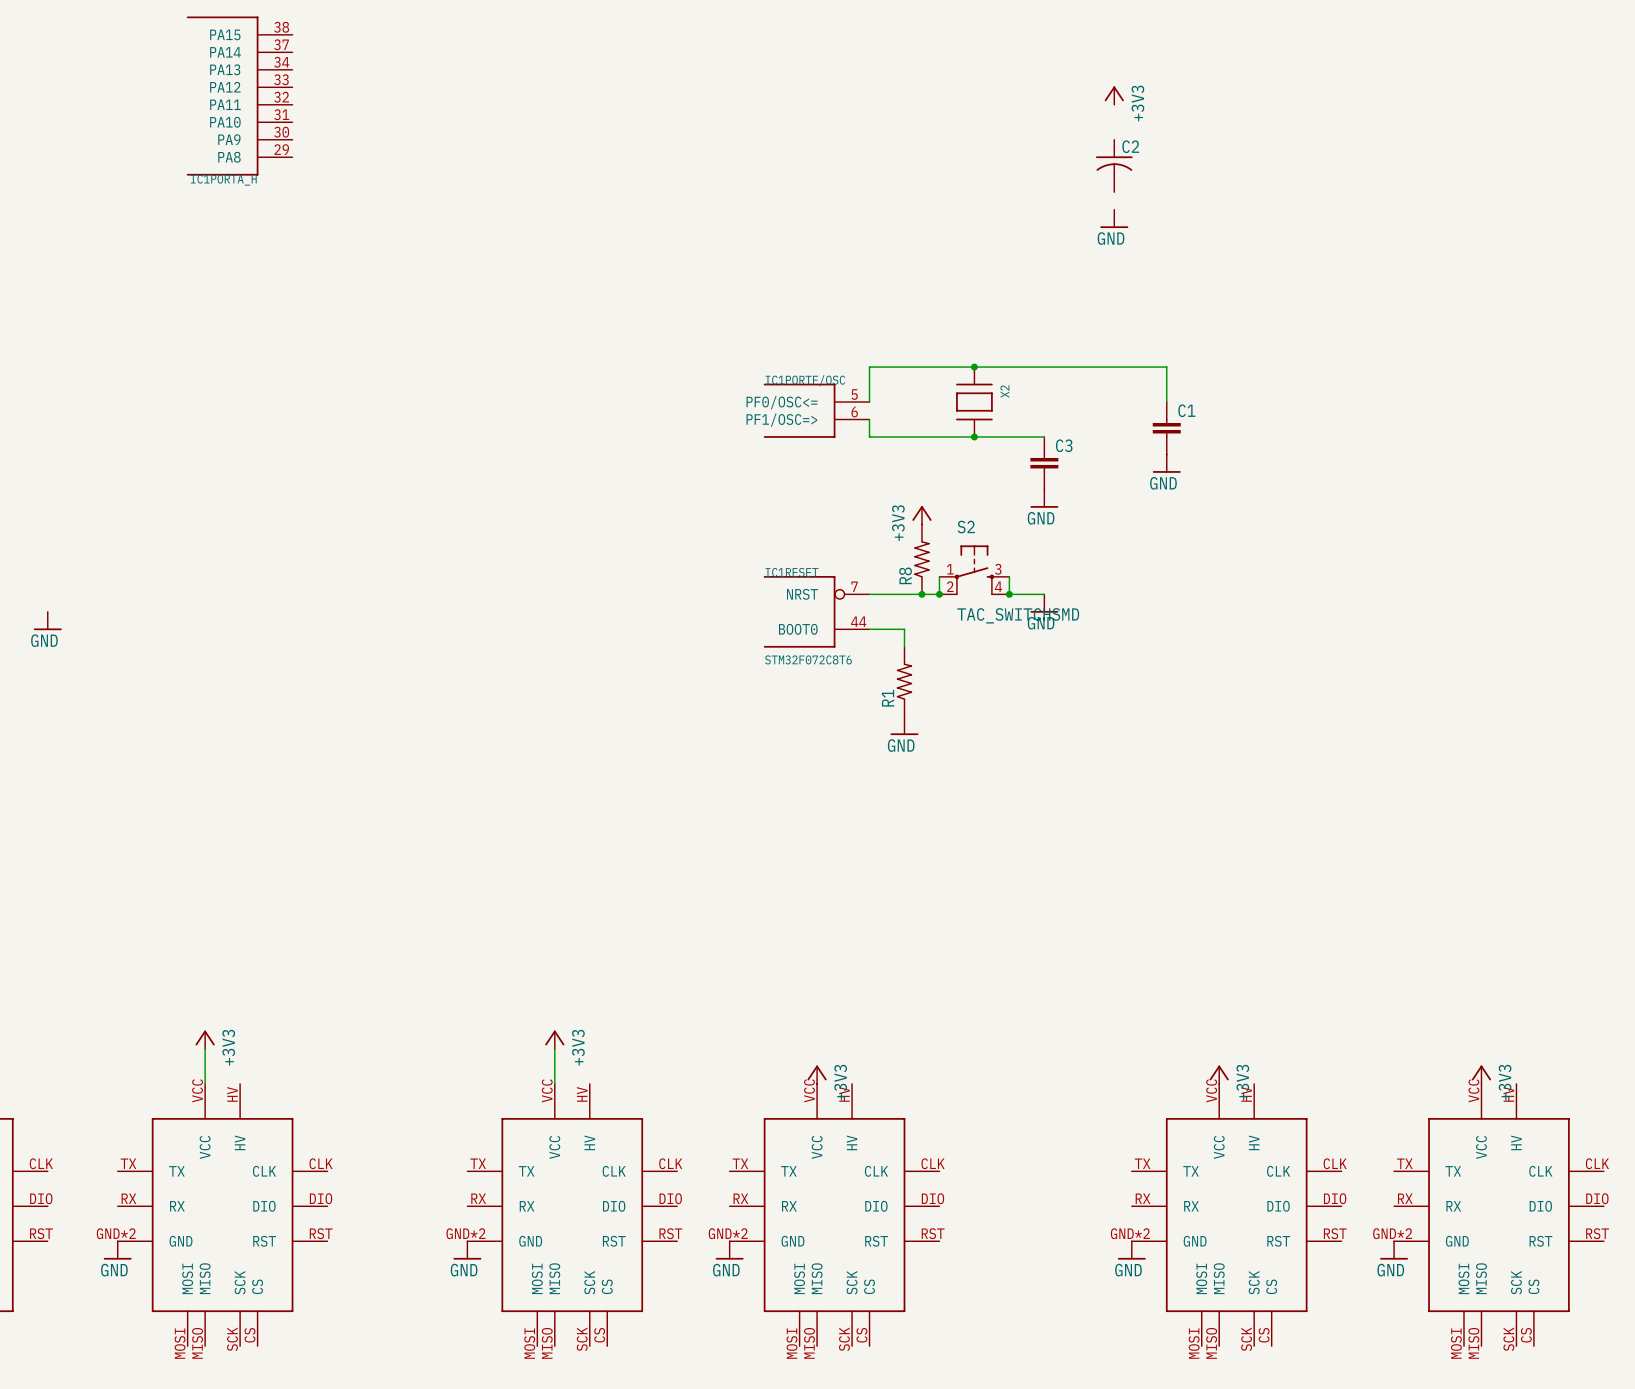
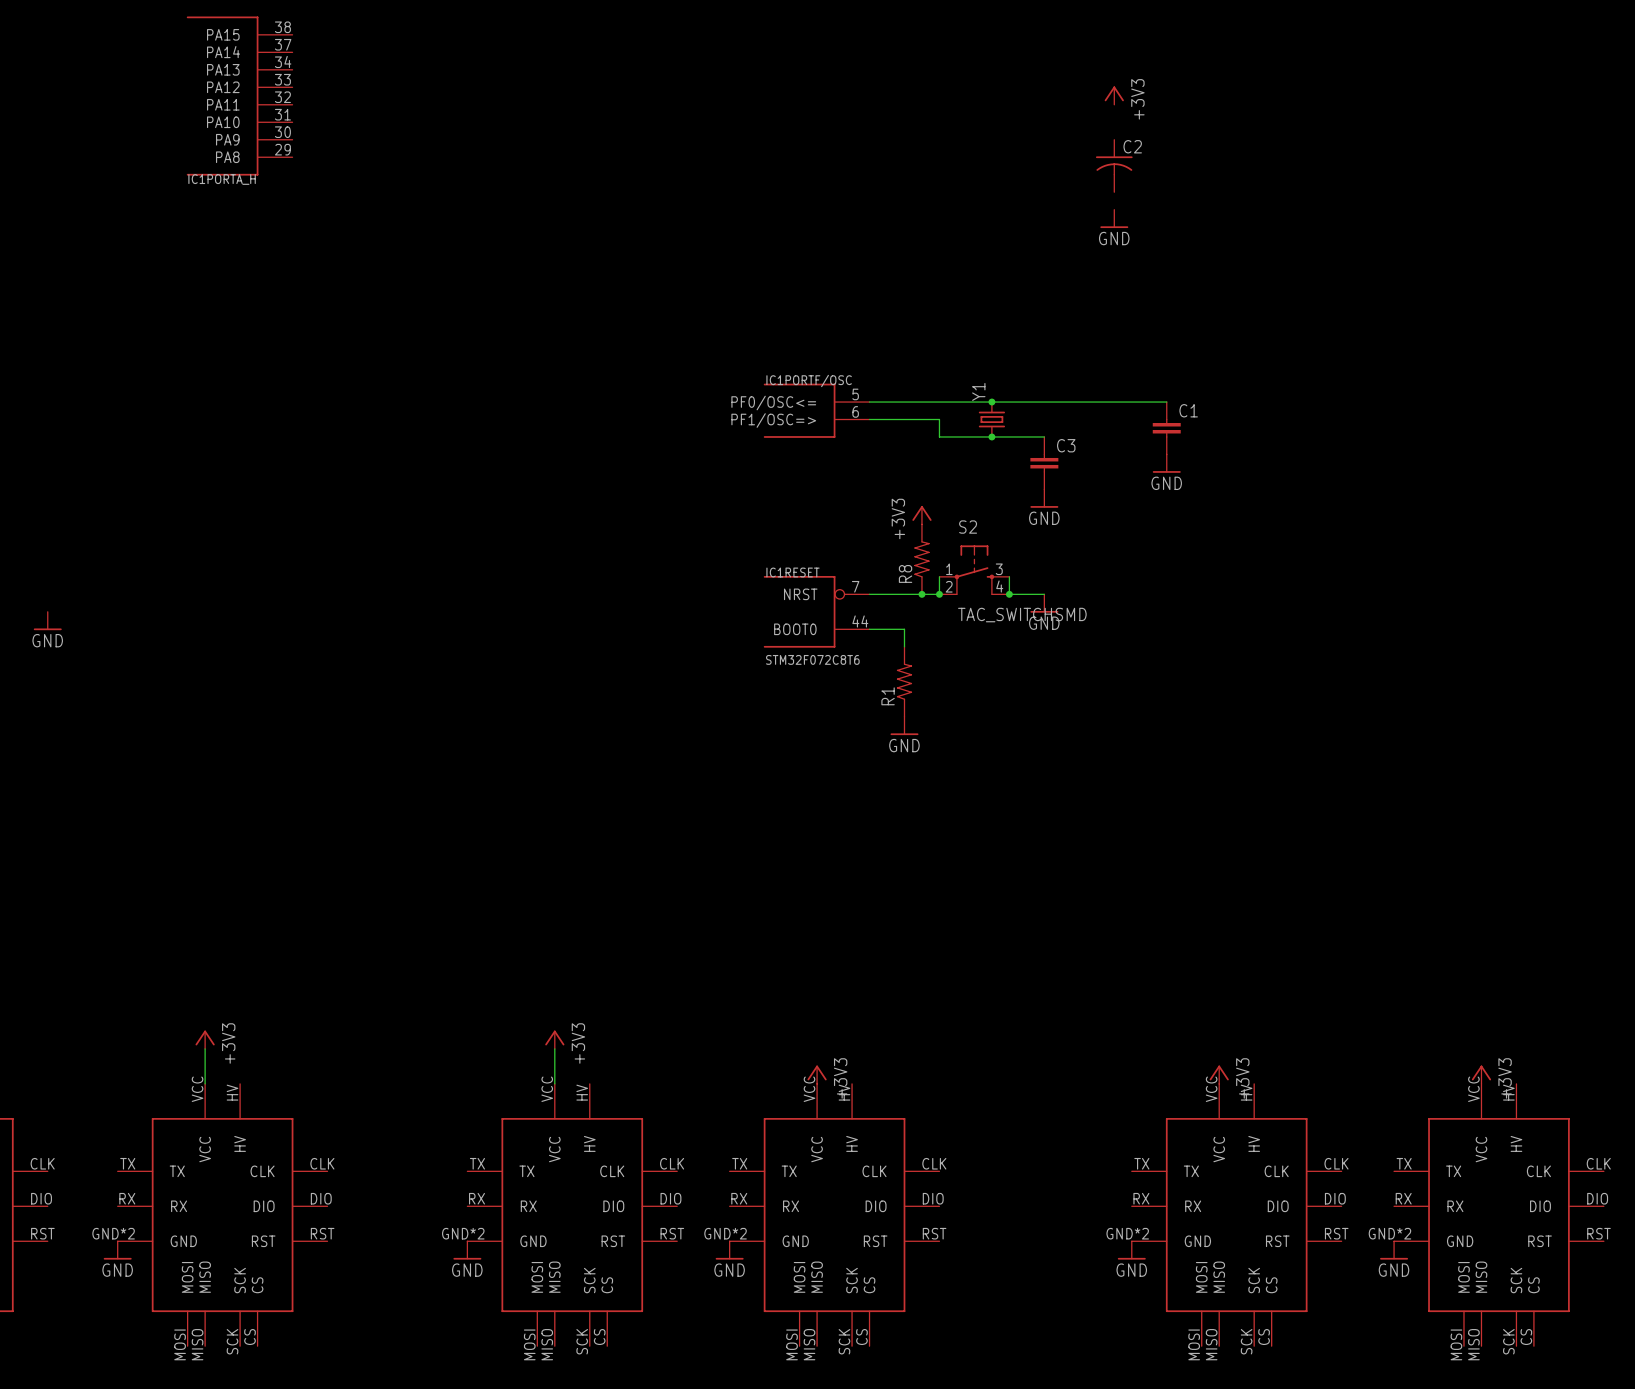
junction: (974, 367) -> none
wire: (869, 402) (869, 367) (1166, 367) (1166, 402) -> (869, 402) (1166, 402)
X2: (974, 402) -> none
junction: none -> (991, 402)
wire: (869, 419) (869, 436) (939, 436) -> (869, 419) (939, 419) (939, 436)
Y1: none -> (991, 419)
junction position: (974, 436) -> (991, 436)

